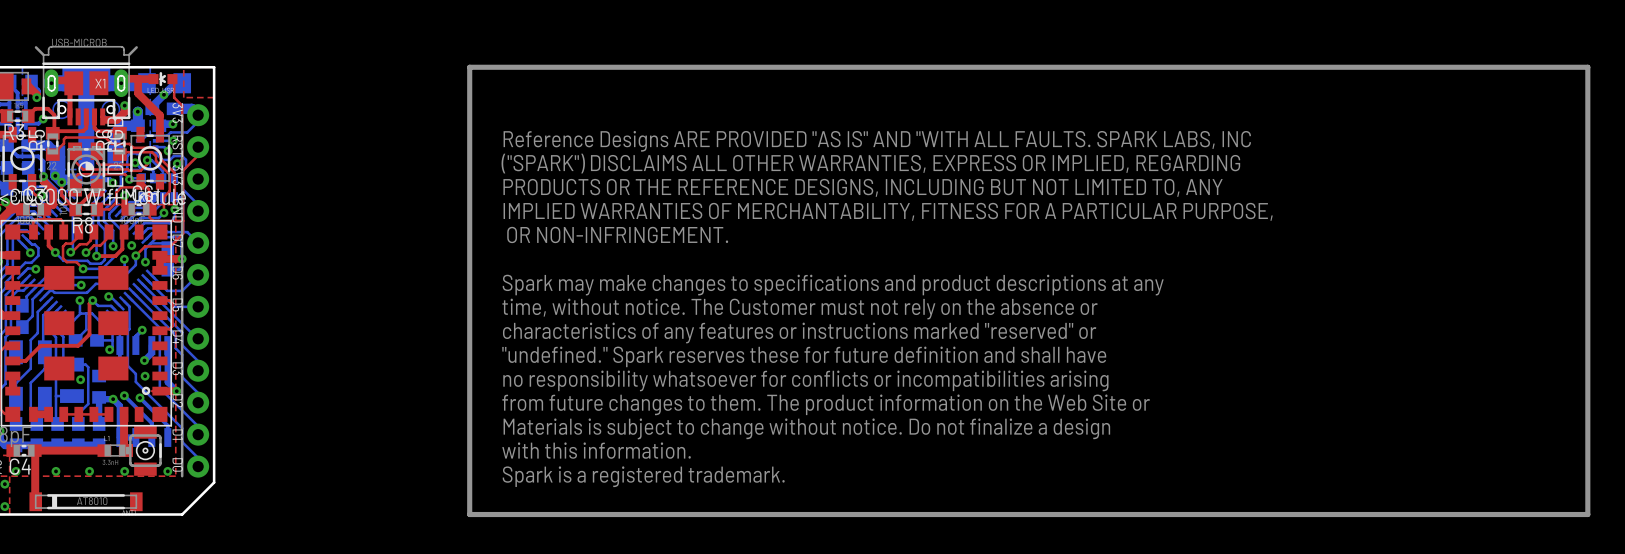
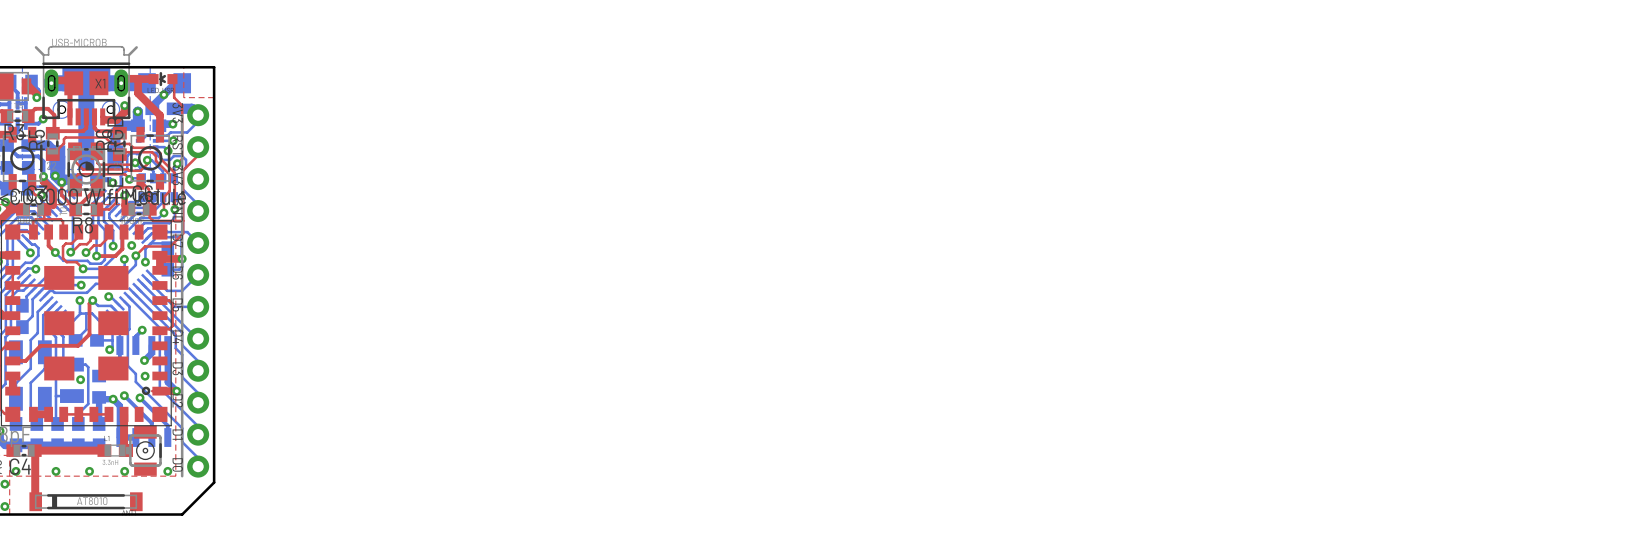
line: (469, 67) (469, 514) (1587, 514) (1587, 67) (469, 67) -> none
text: Reference Designs ARE PROVIDED "AS IS" AND "WITH ALL FAULTS. SPARK LABS, INC (877, 141) -> none
text: ("SPARK") DISCLAIMS ALL OTHER WARRANTIES, EXPRESS OR IMPLIED, REGARDING (870, 163) -> none
text: PRODUCTS OR THE REFERENCE DESIGNS, INCLUDING BUT NOT LIMITED TO, ANY (863, 187) -> none
text: IMPLIED WARRANTIES OF MERCHANTABILITY, FITNESS FOR A PARTICULAR PURPOSE, (888, 211) -> none
text: OR NON-INFRINGEMENT. (617, 234) -> none
text: Spark may make changes to specifications and product descriptions at any (833, 285) -> none
text: time, without notice. The Customer must not rely on the absence or (800, 309) -> none
text: characteristics of any features or instructions marked "reserved" or (799, 332) -> none
text: "undefined." Spark reserves these for future definition and shall have (804, 356) -> none
text: no responsibility whatsoever for conflicts or incompatibilities arising (805, 380) -> none
text: from future changes to them. The product information on the Web Site or (826, 404) -> none
text: Materials is subject to change without notice. Do not finalize a design (806, 428) -> none
text: with this information. (596, 450) -> none
text: Spark is a registered trademark. (643, 476) -> none

